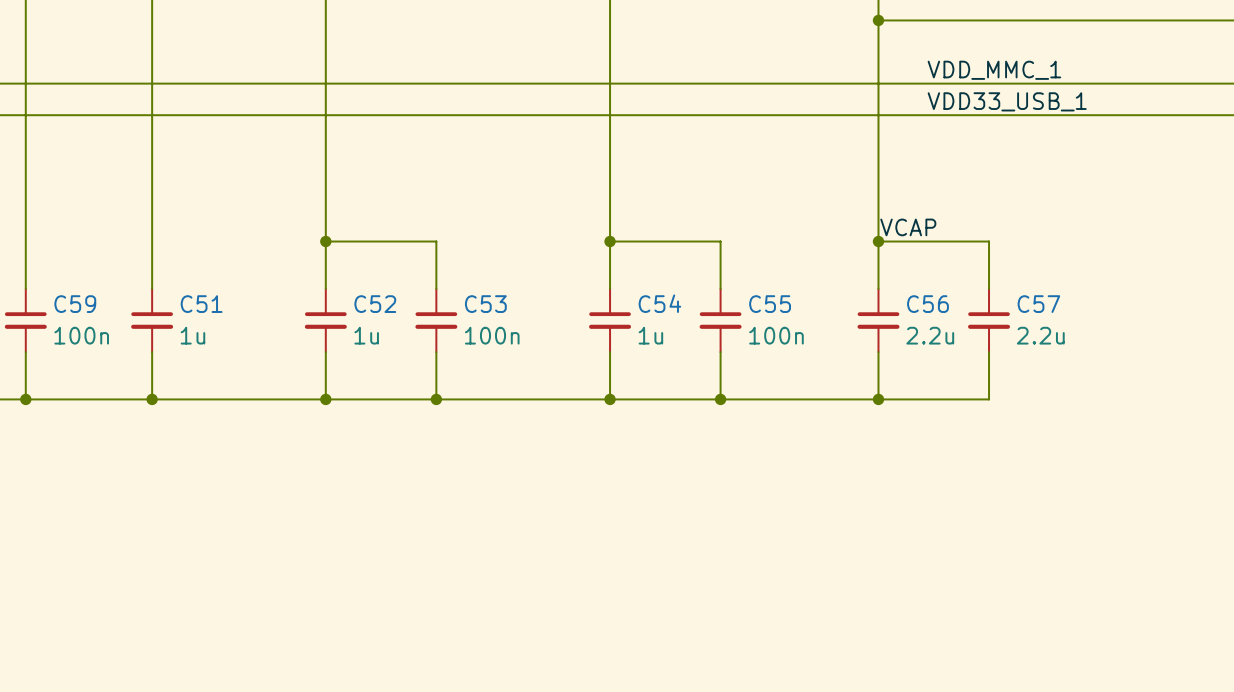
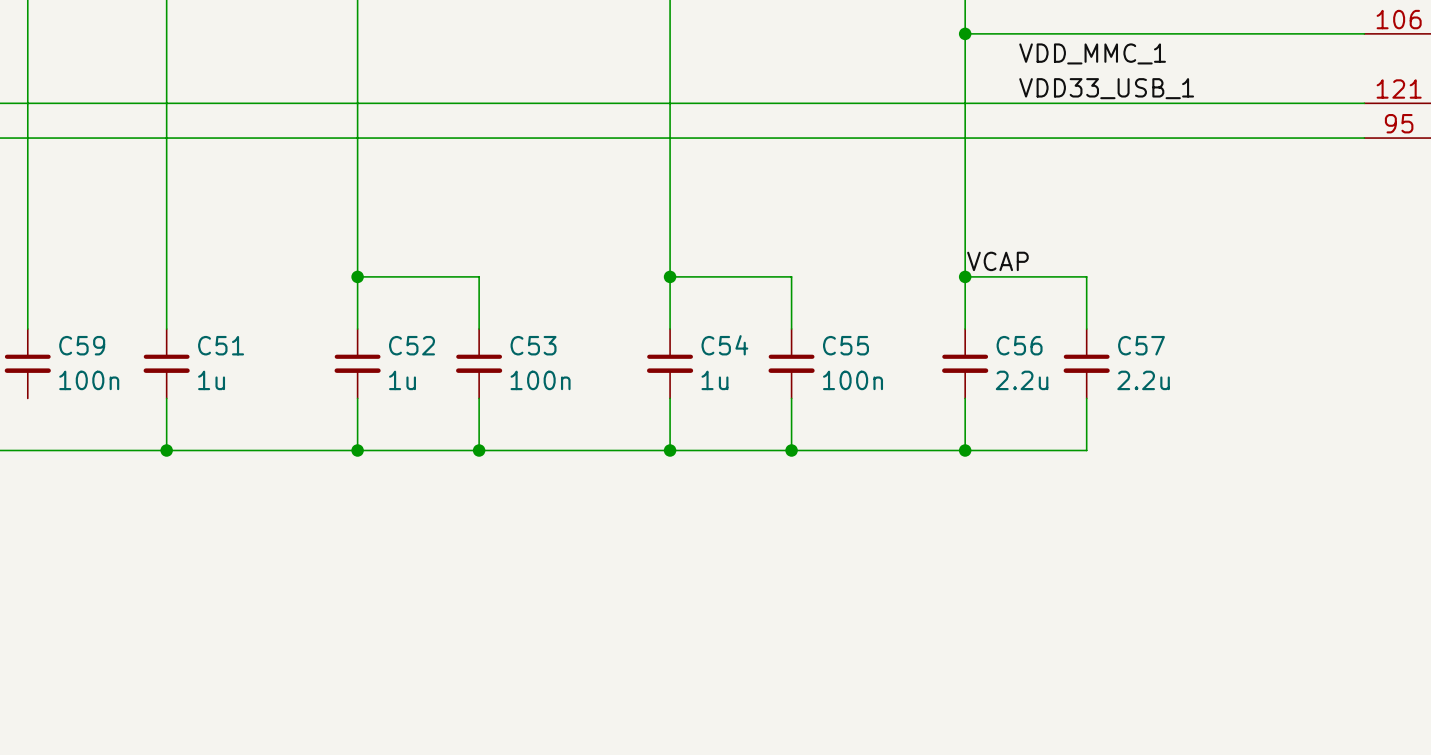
label: none -> VDD_MMC_1 (1092, 53)
label: VDD_MMC_1 (994, 70) -> VDD33_USB_1 (1106, 88)
label: VDD33_USB_1 (1007, 101) -> none
wire: (25, 352) (25, 399) -> none
junction: (25, 399) -> none

